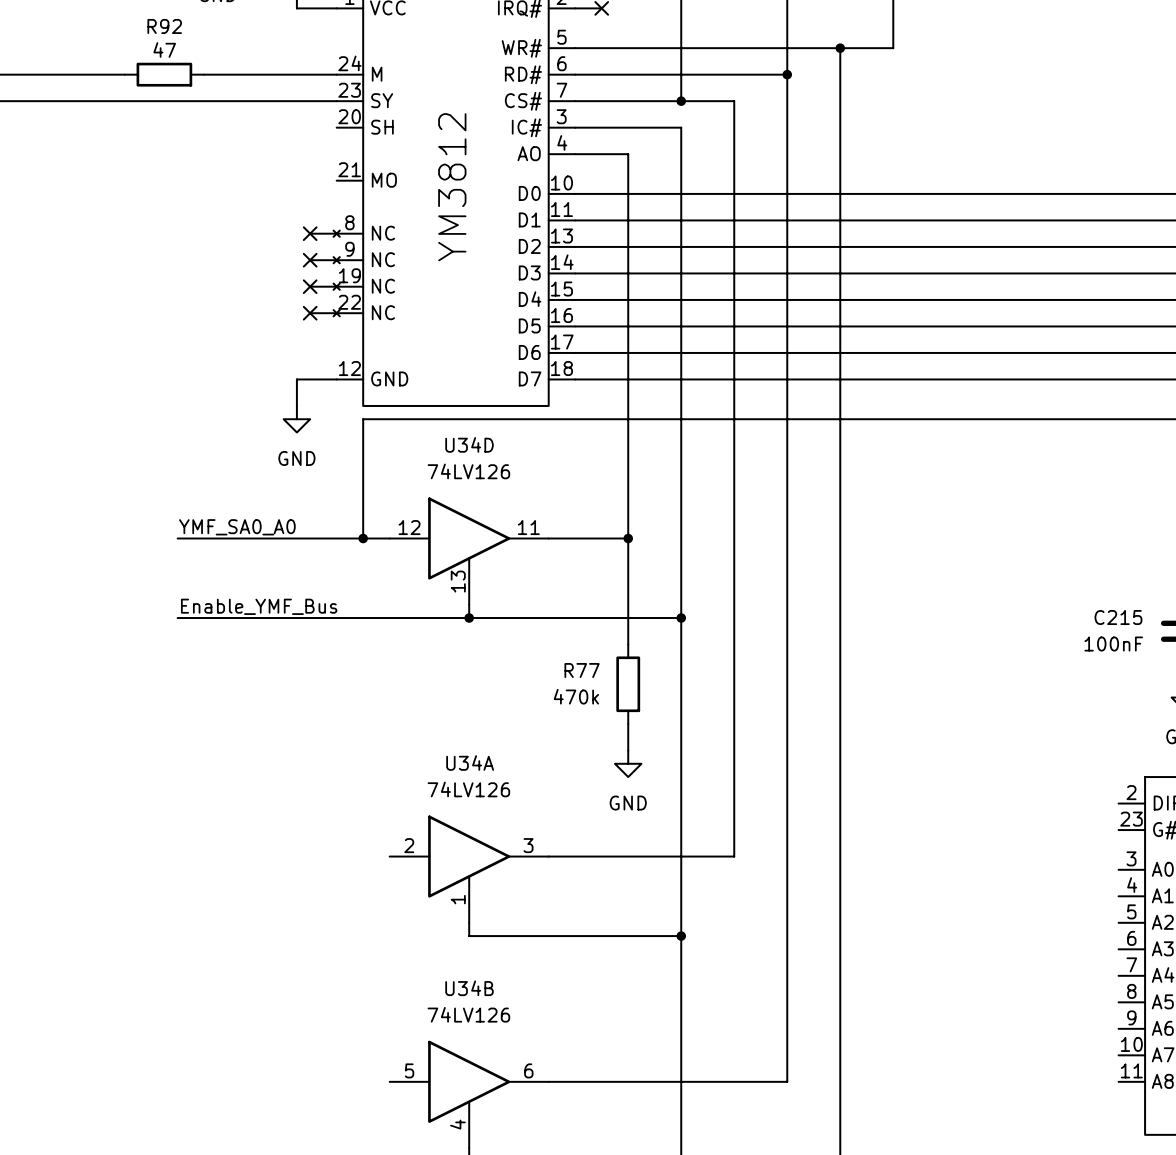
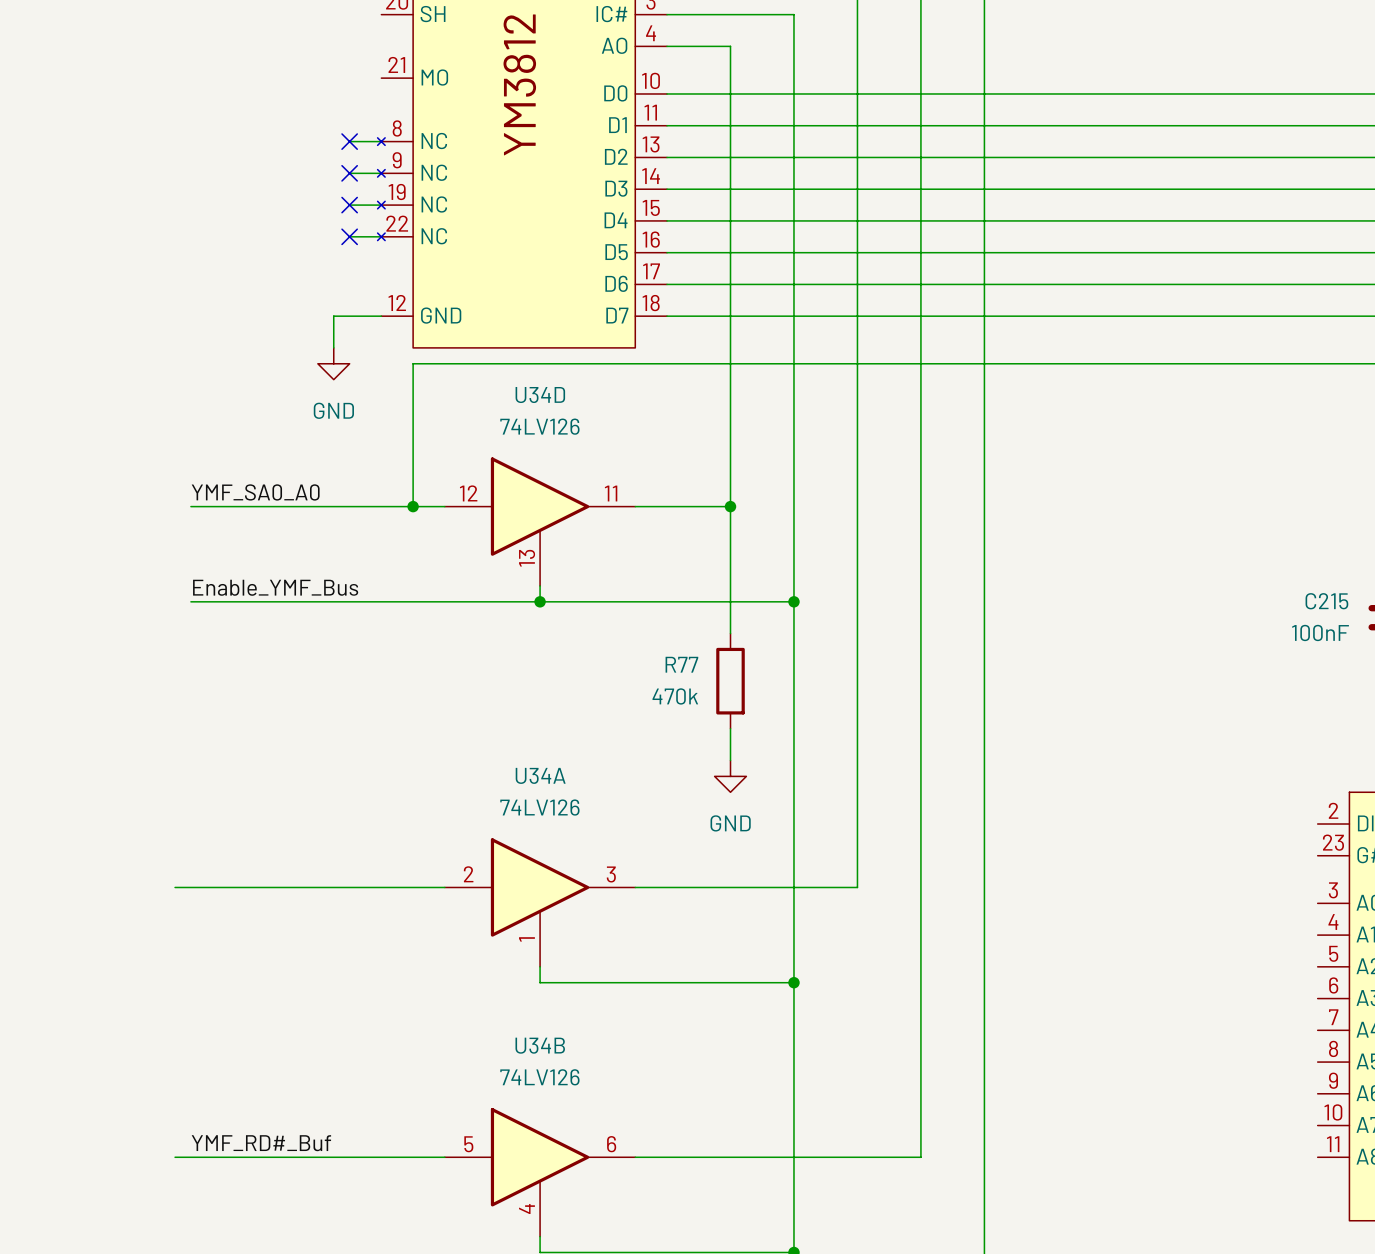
wire: none -> (175, 887) (444, 887)
label: none -> YMF_RD#_Buf (261, 1143)
wire: none -> (175, 1157) (444, 1157)

